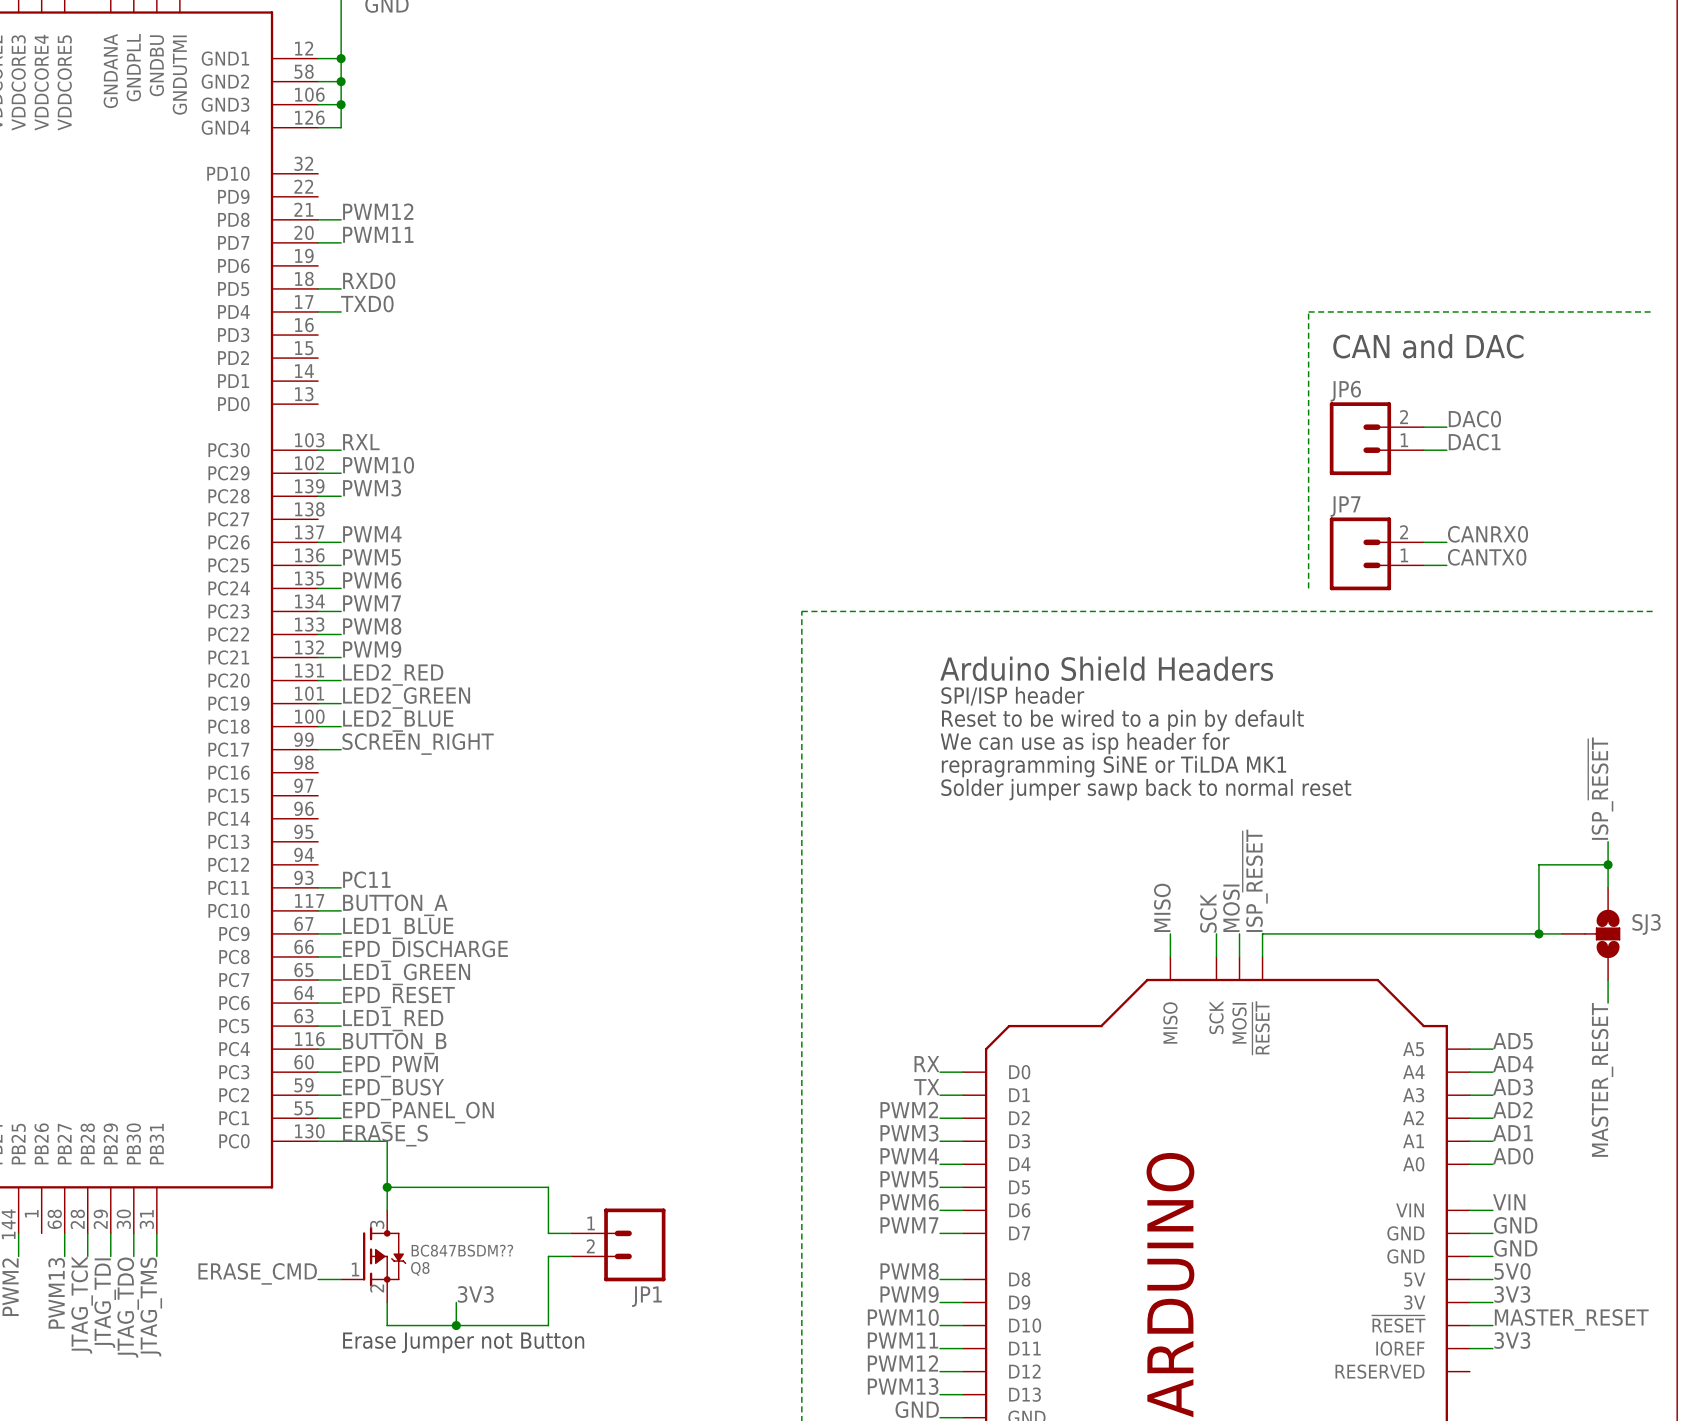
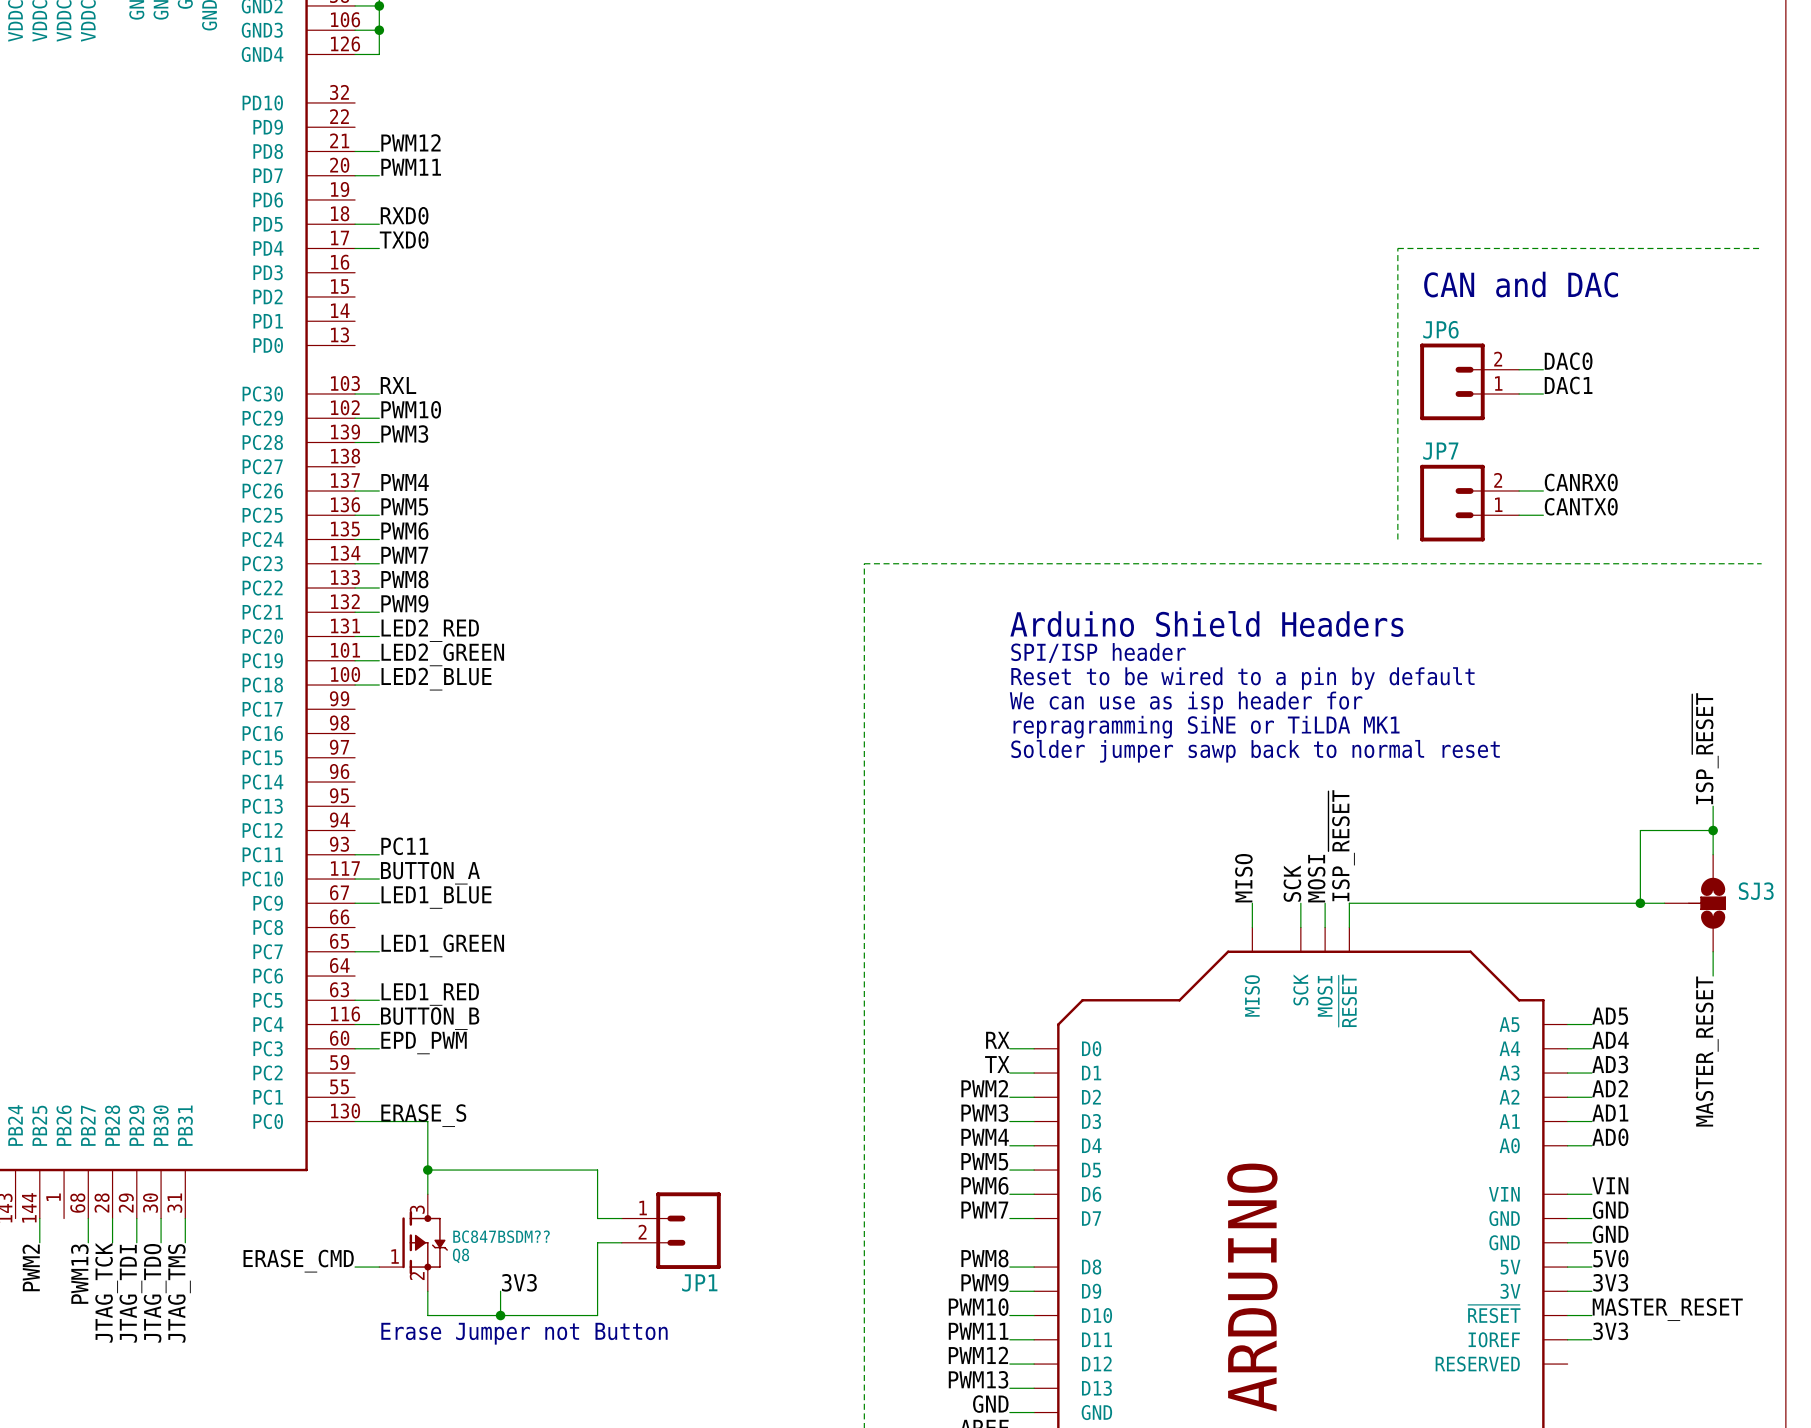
label: SCREEN_RIGHT (418, 744) -> none
wire: (318, 749) (341, 749) -> none
label: EPD_DISCHARGE (425, 951) -> none
wire: (318, 956) (341, 956) -> none
label: EPD_RESET (398, 997) -> none
wire: (318, 1003) (341, 1003) -> none
label: EPD_BUSY (393, 1089) -> none
wire: (318, 1095) (341, 1095) -> none
label: EPD_PANEL_ON (418, 1112) -> none
wire: (318, 1118) (341, 1118) -> none

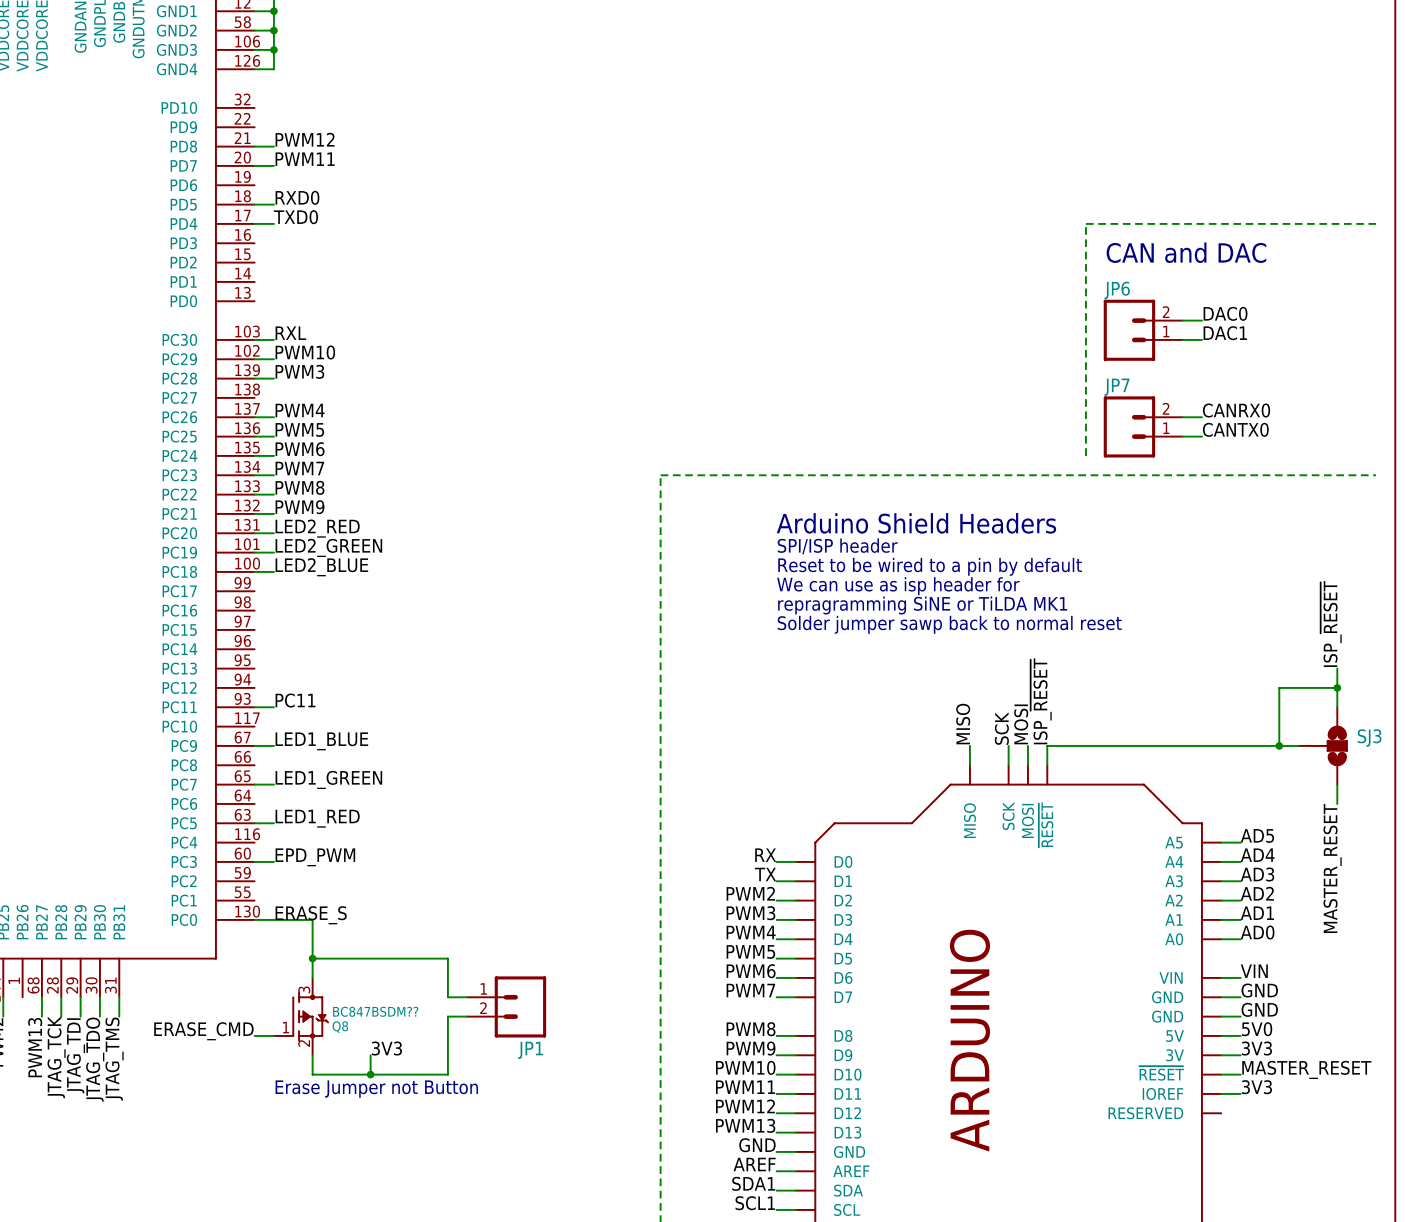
label: BUTTON_A (430, 873) -> none
wire: (355, 879) (379, 879) -> none
label: BUTTON_B (430, 1018) -> none
wire: (355, 1024) (379, 1024) -> none

